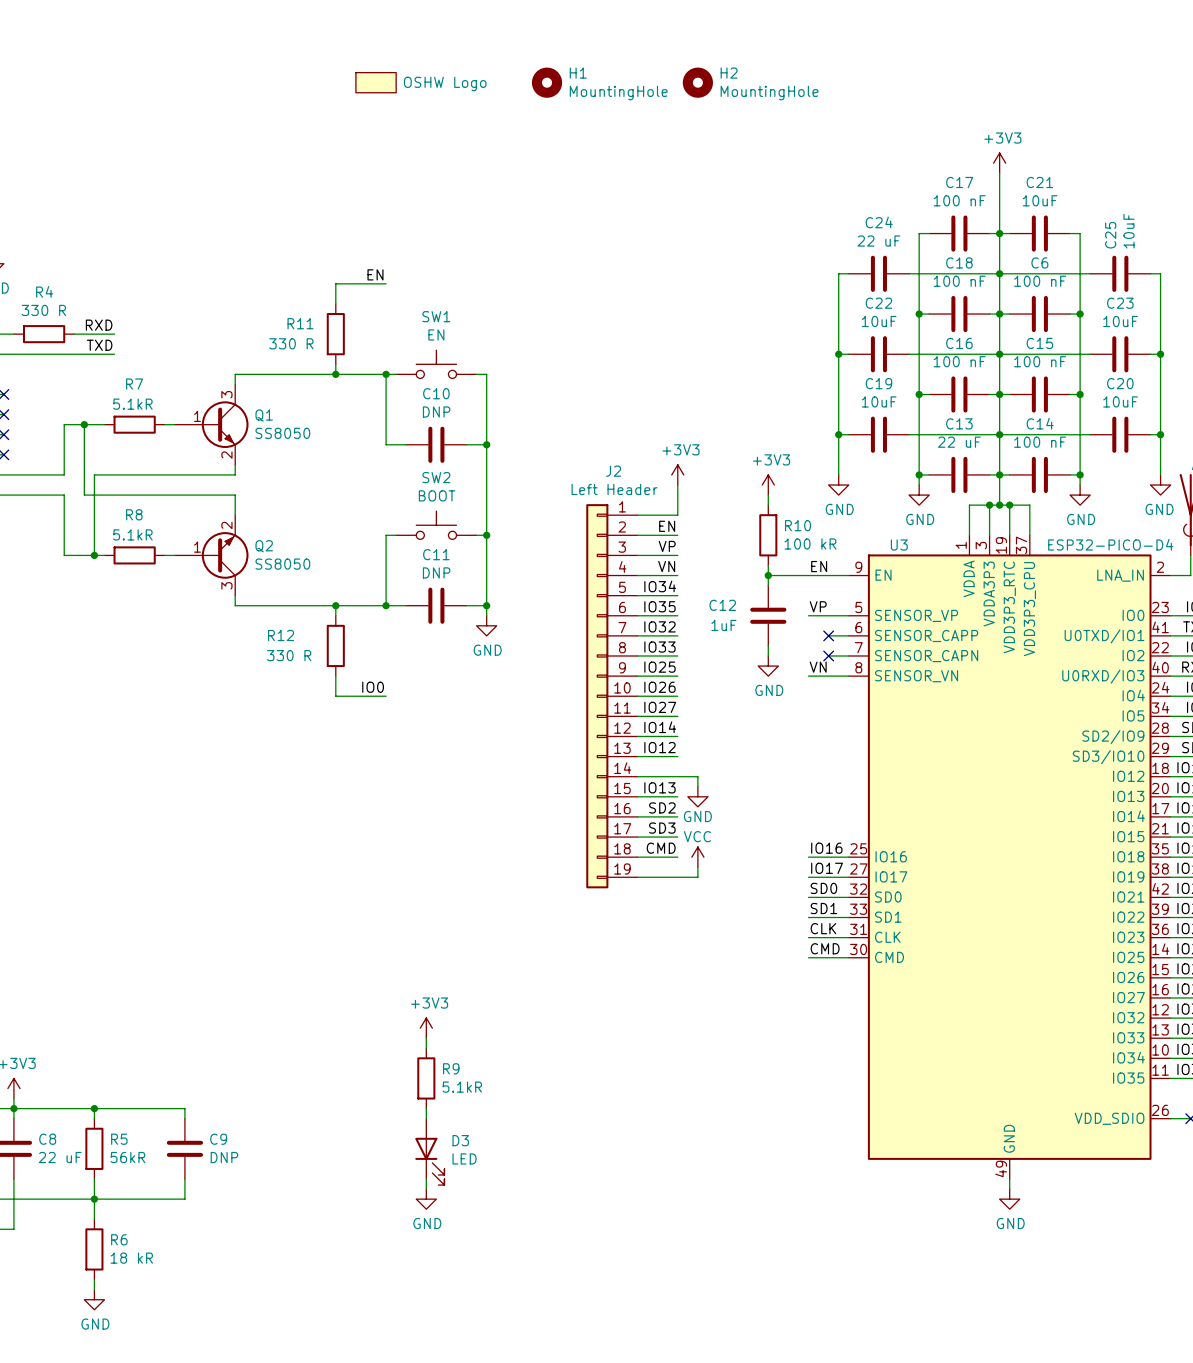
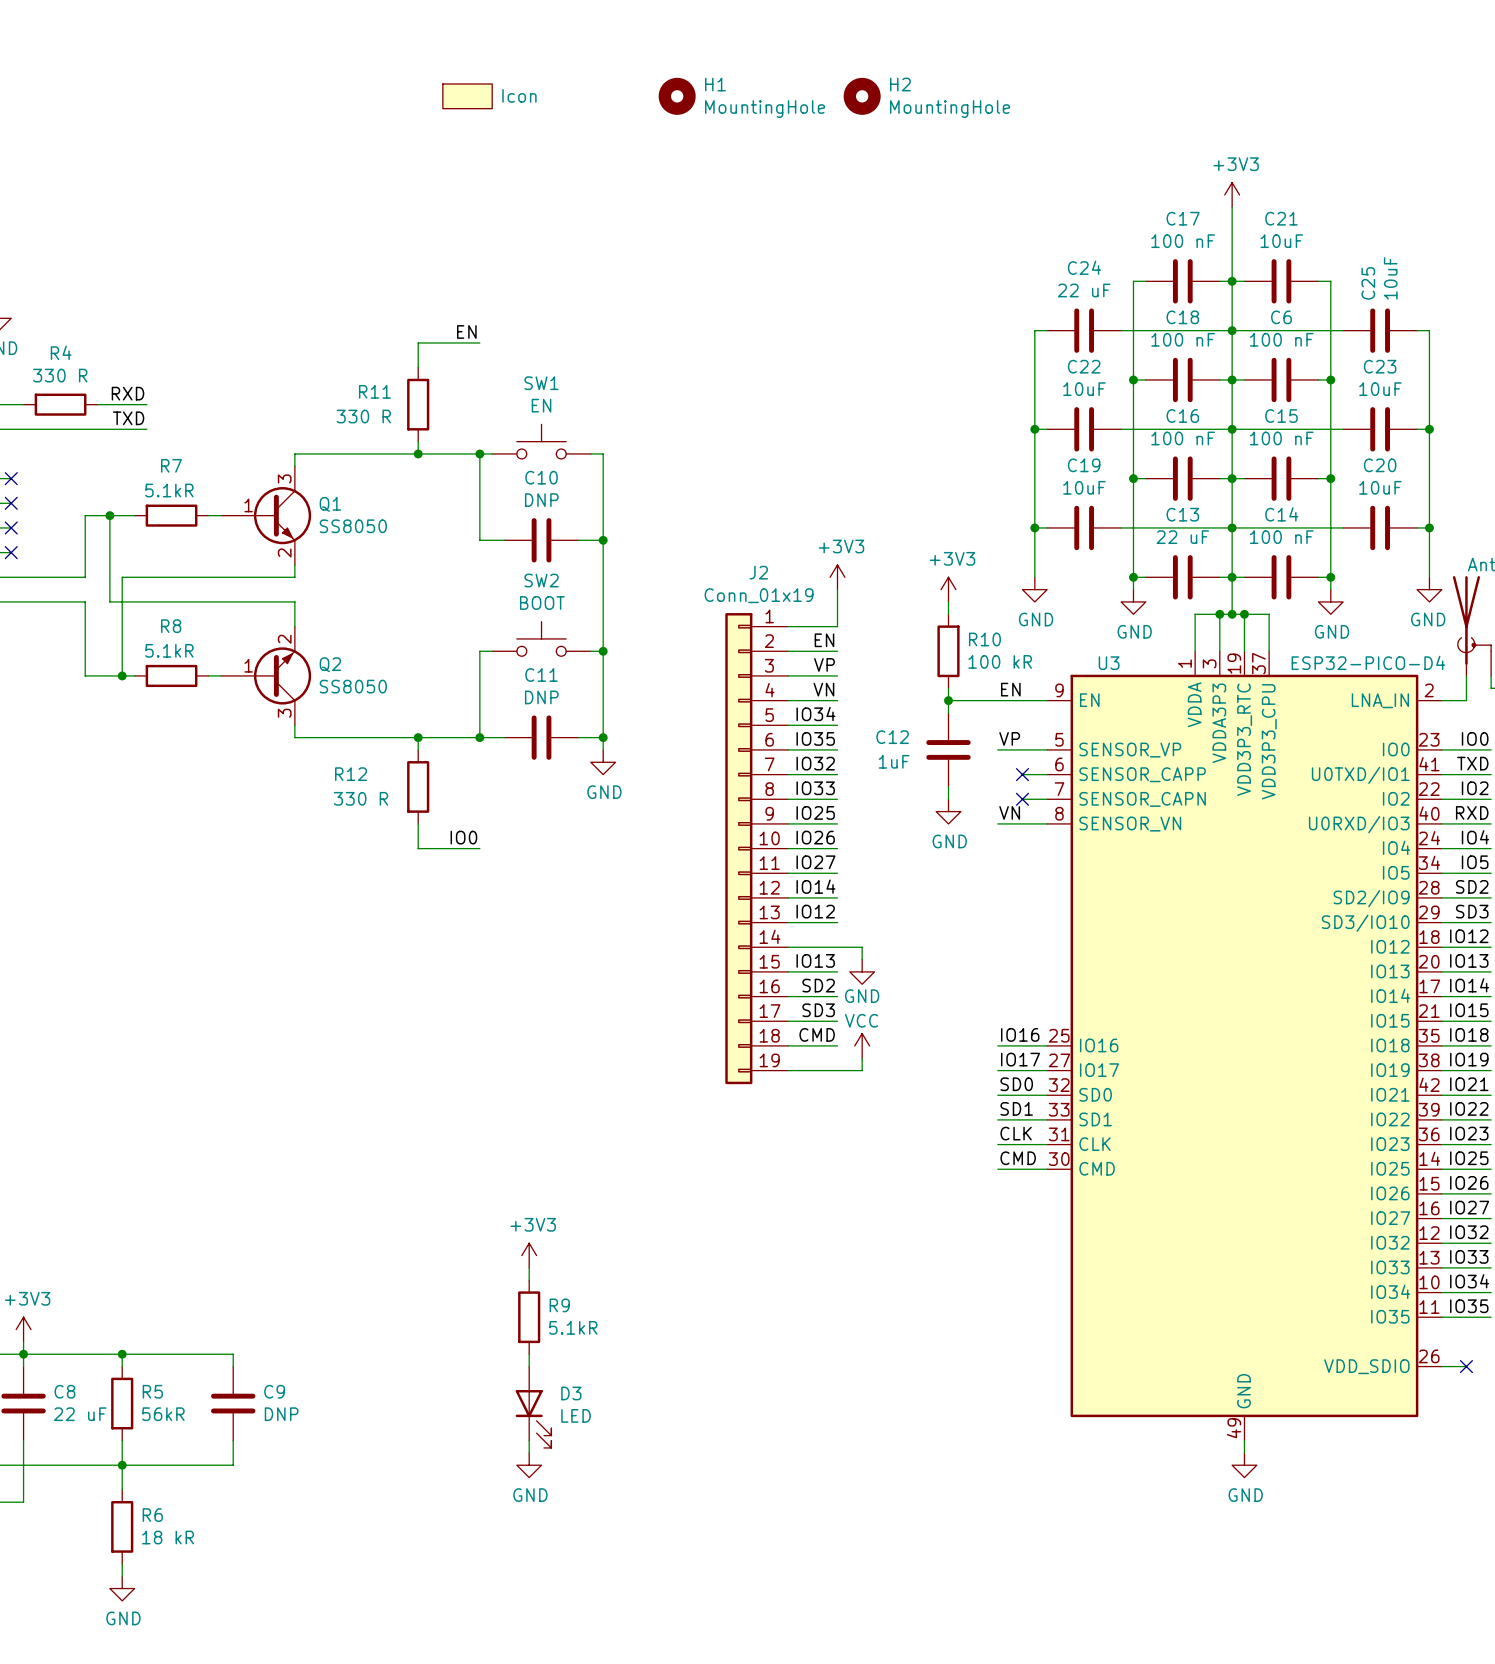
part value: OSHW Logo (445, 83) -> Icon (519, 95)
J2 value: Left Header (614, 489) -> Conn_01x19 (759, 595)

